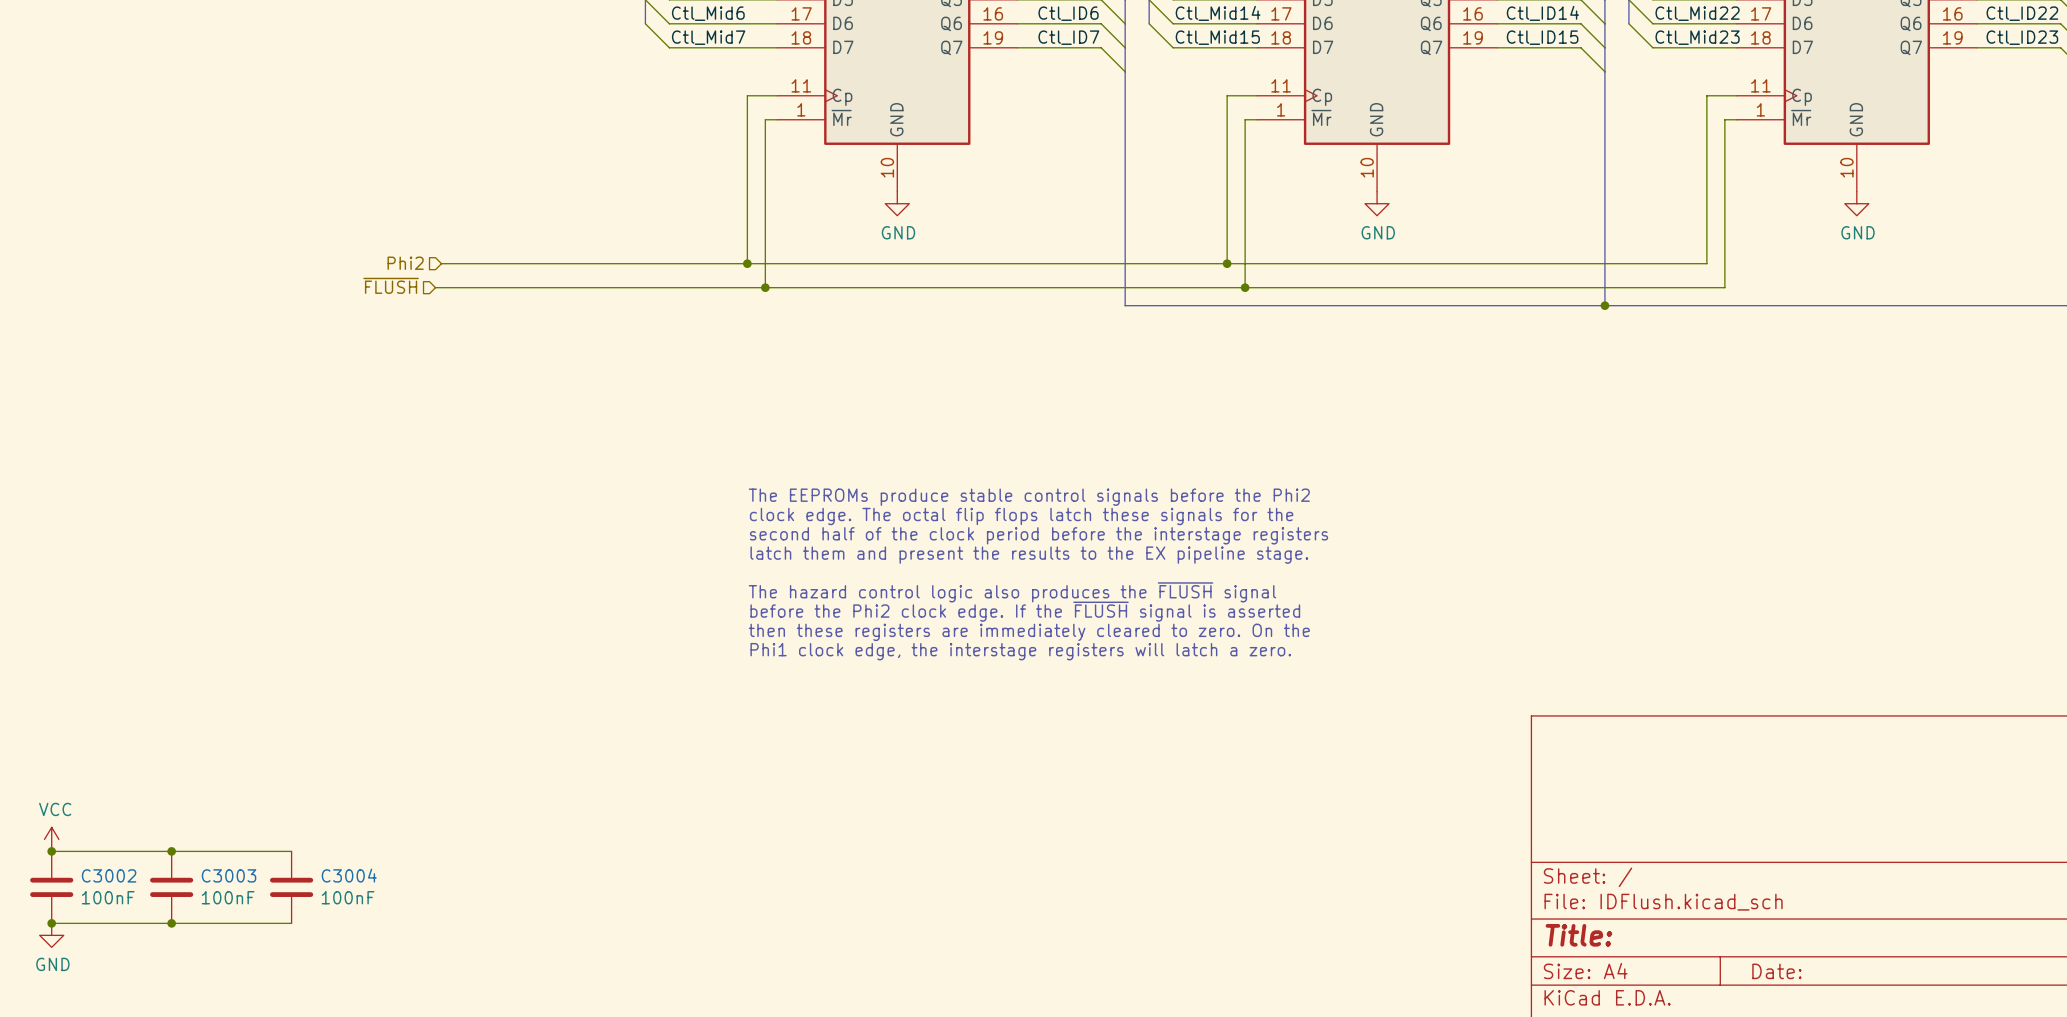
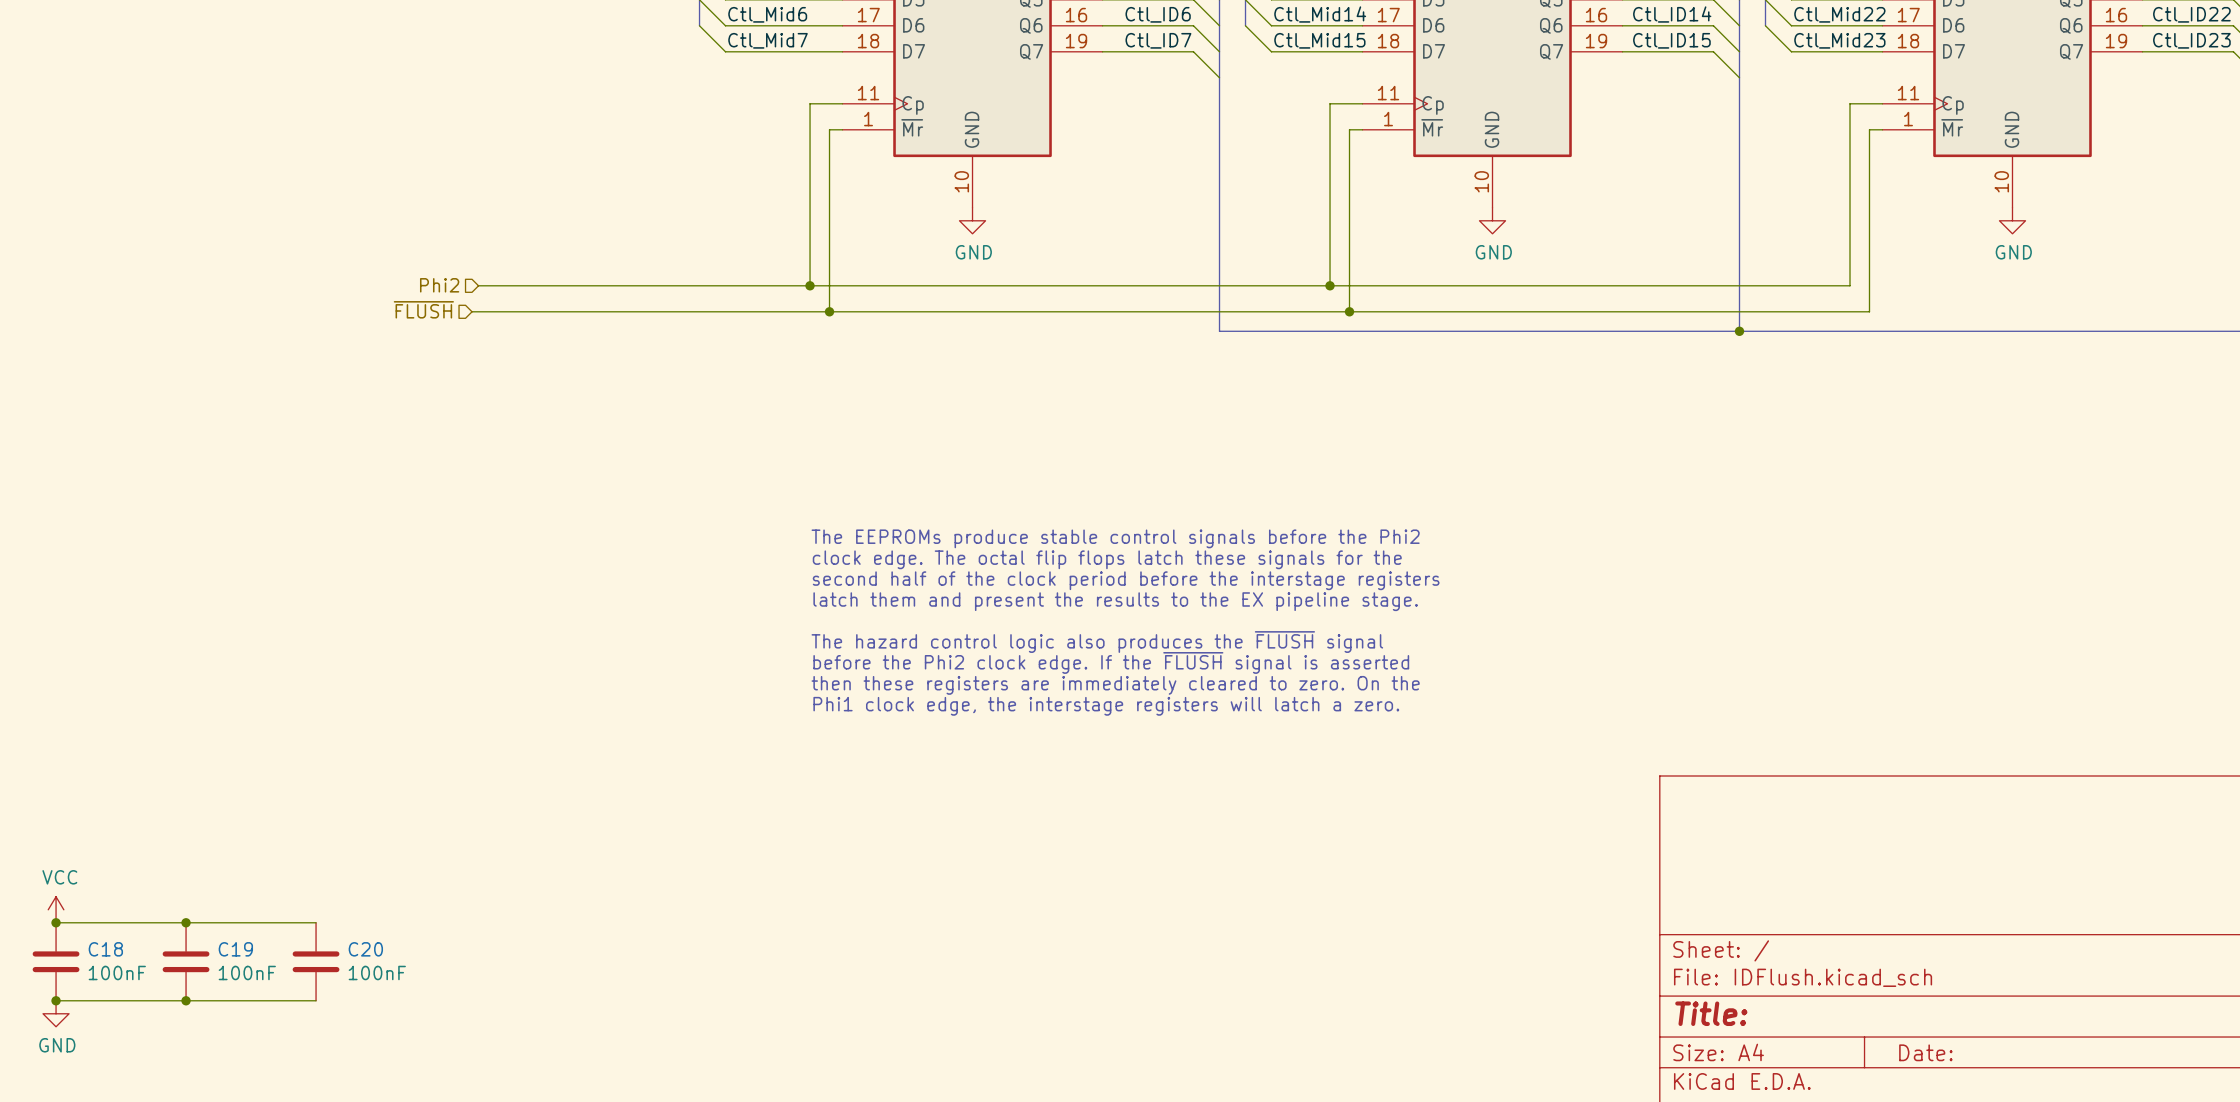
C3002 name: C3002 (109, 875) -> C18 (105, 949)
C3003 name: C3003 (229, 875) -> C19 (235, 949)
C3004 name: C3004 (349, 875) -> C20 (365, 949)

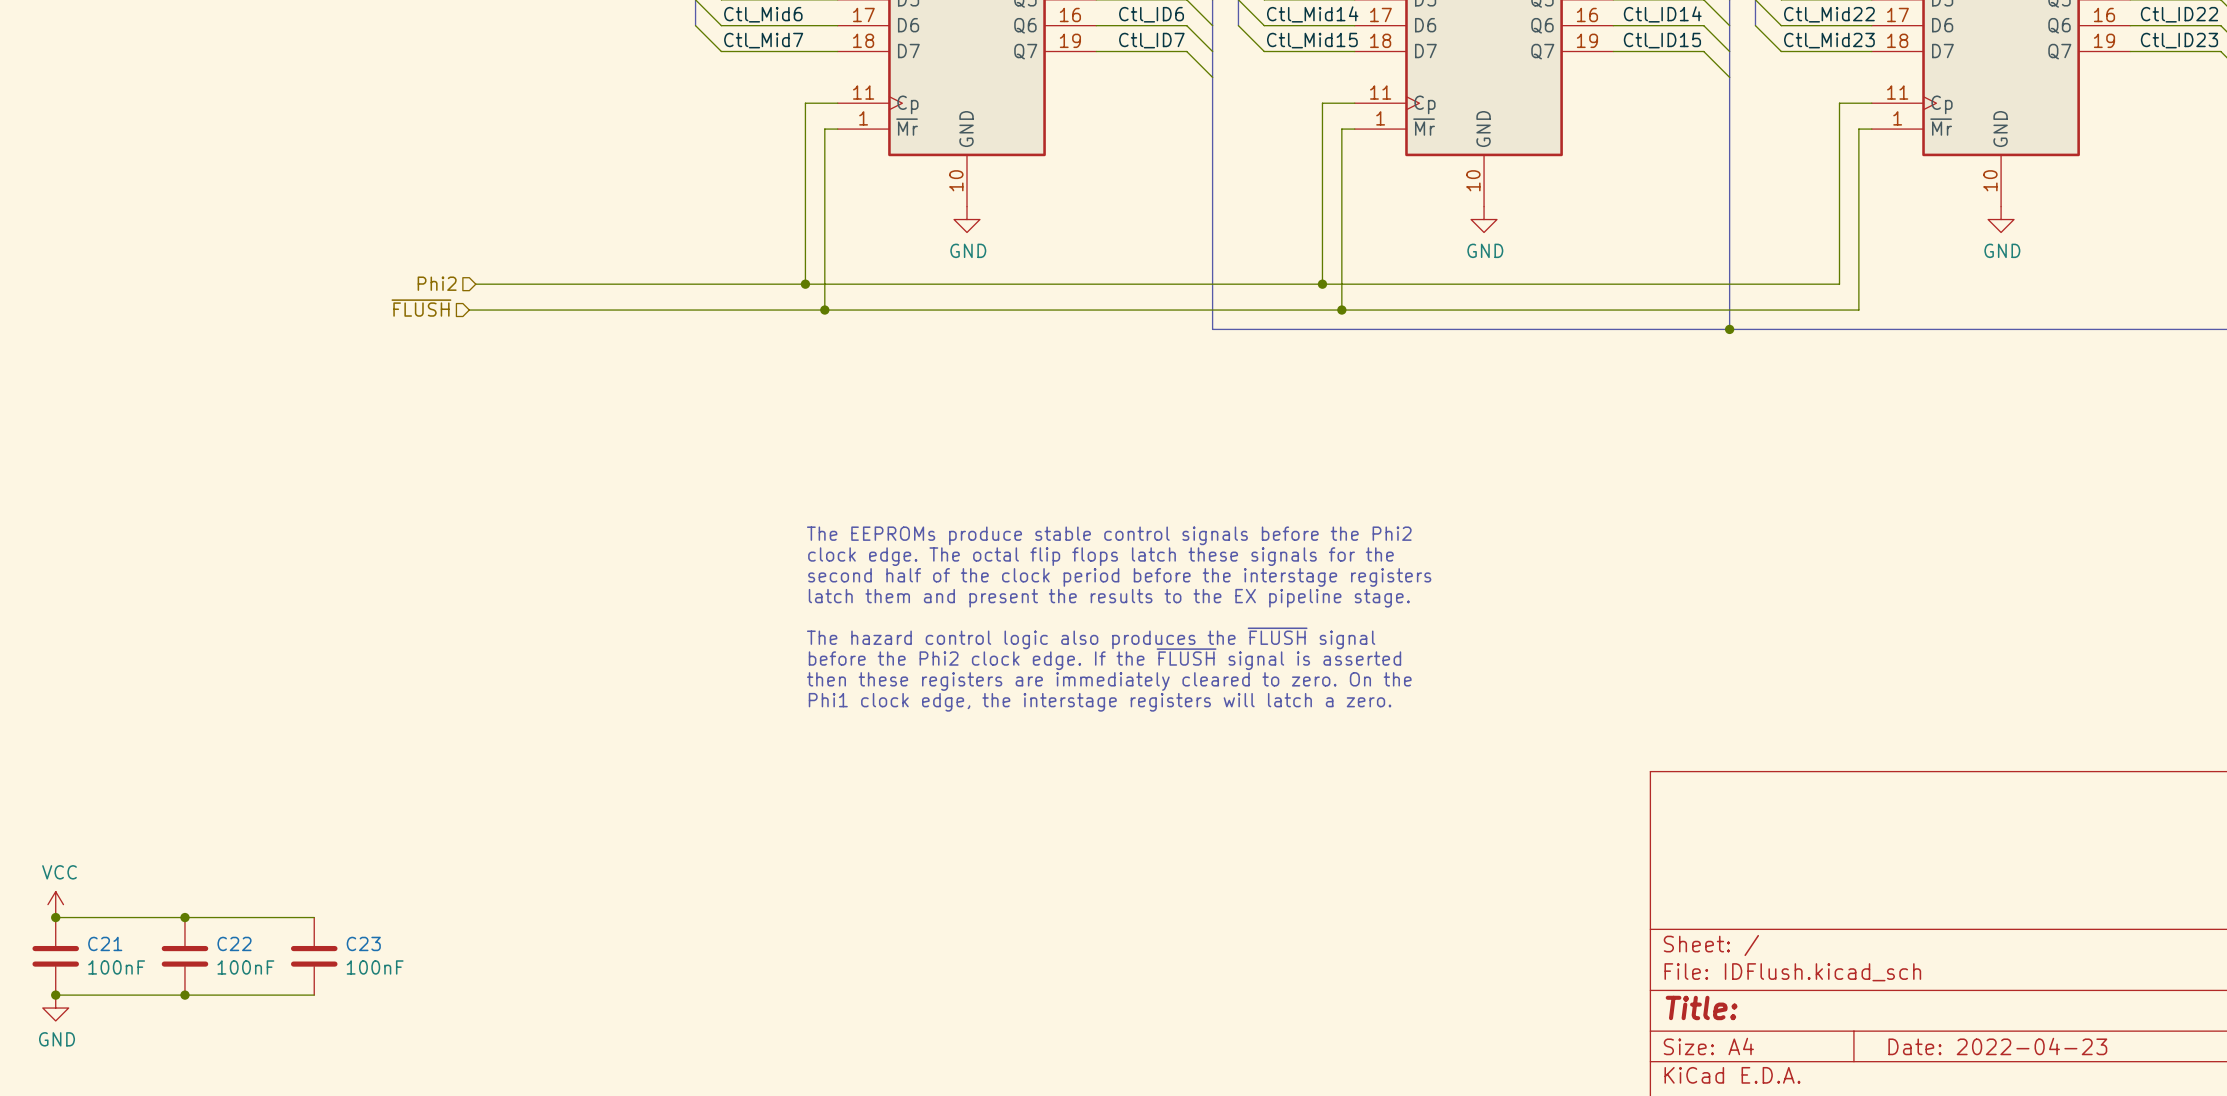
C18 name: C18 (105, 949) -> C21 (105, 943)
C19 name: C19 (235, 949) -> C22 (234, 943)
C20 name: C20 (365, 949) -> C23 (363, 943)
title block: Date: (1925, 1052) -> Date: 2022-04-23 (1997, 1046)

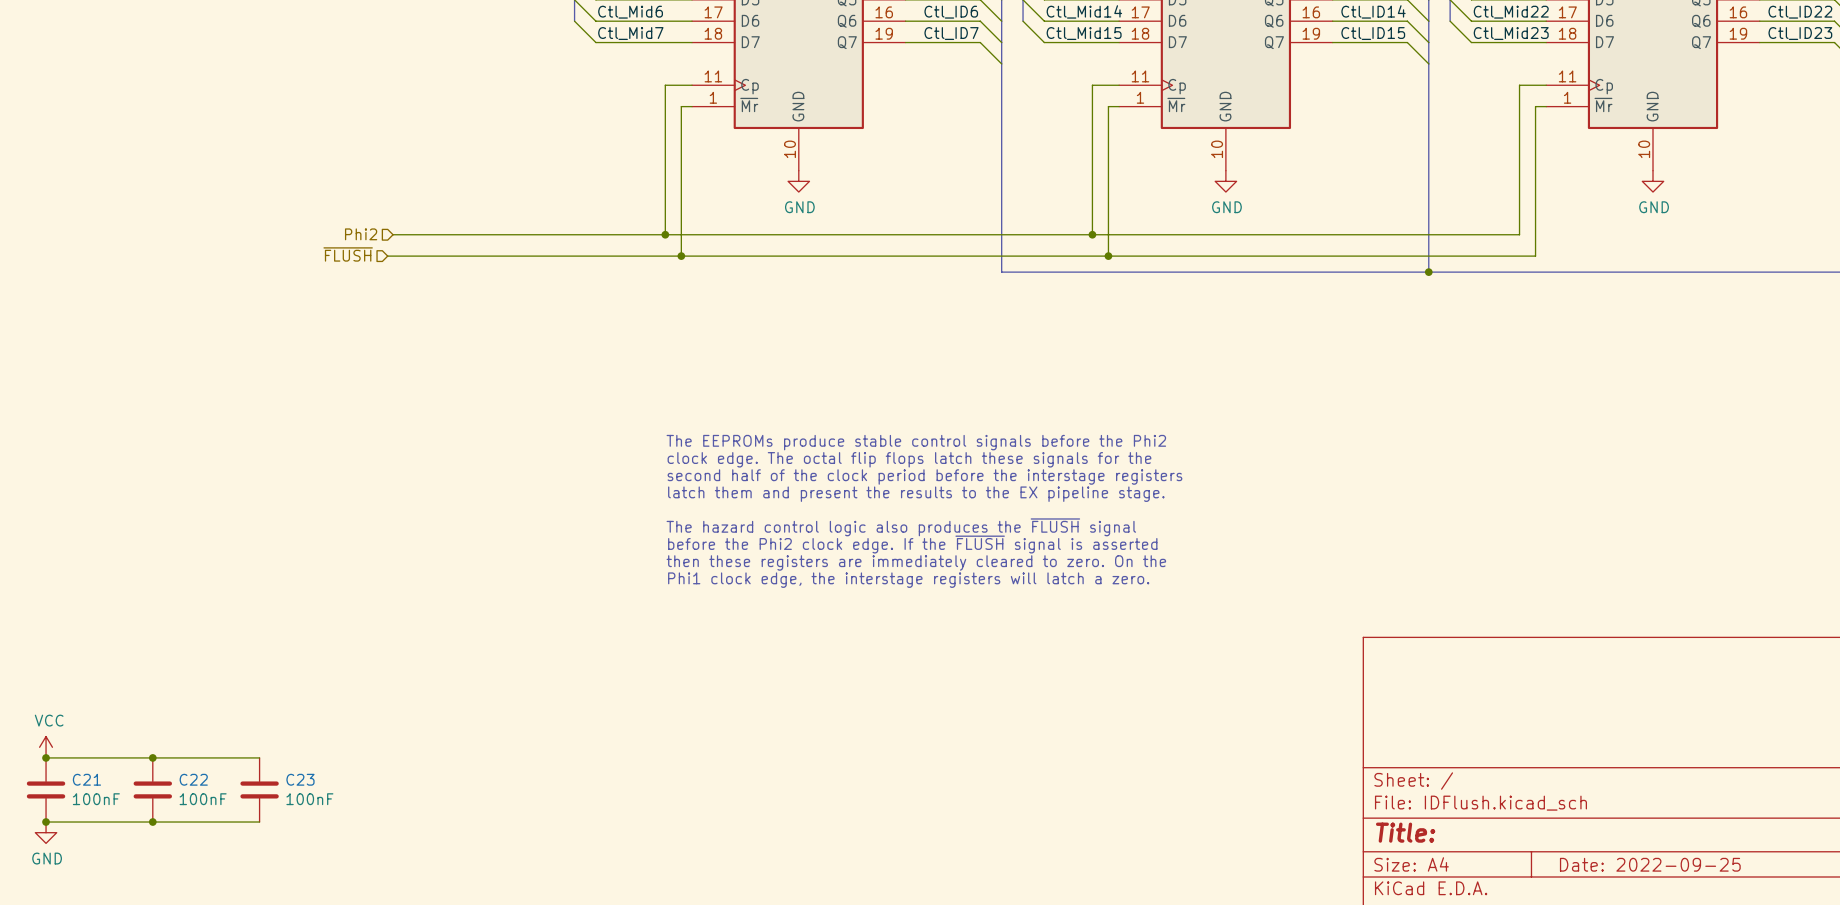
title block: Date: 2022-04-23 (1997, 1046) -> Date: 2022-09-25 (1650, 864)

